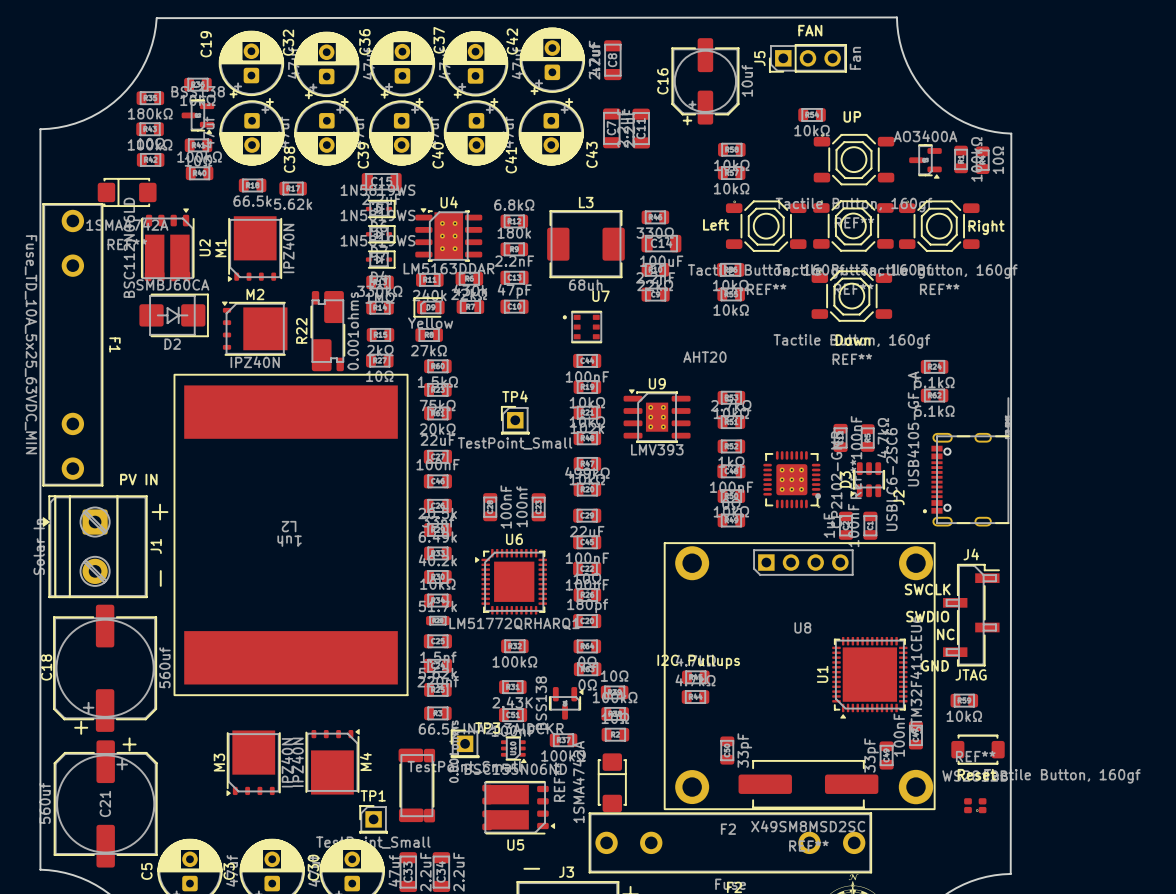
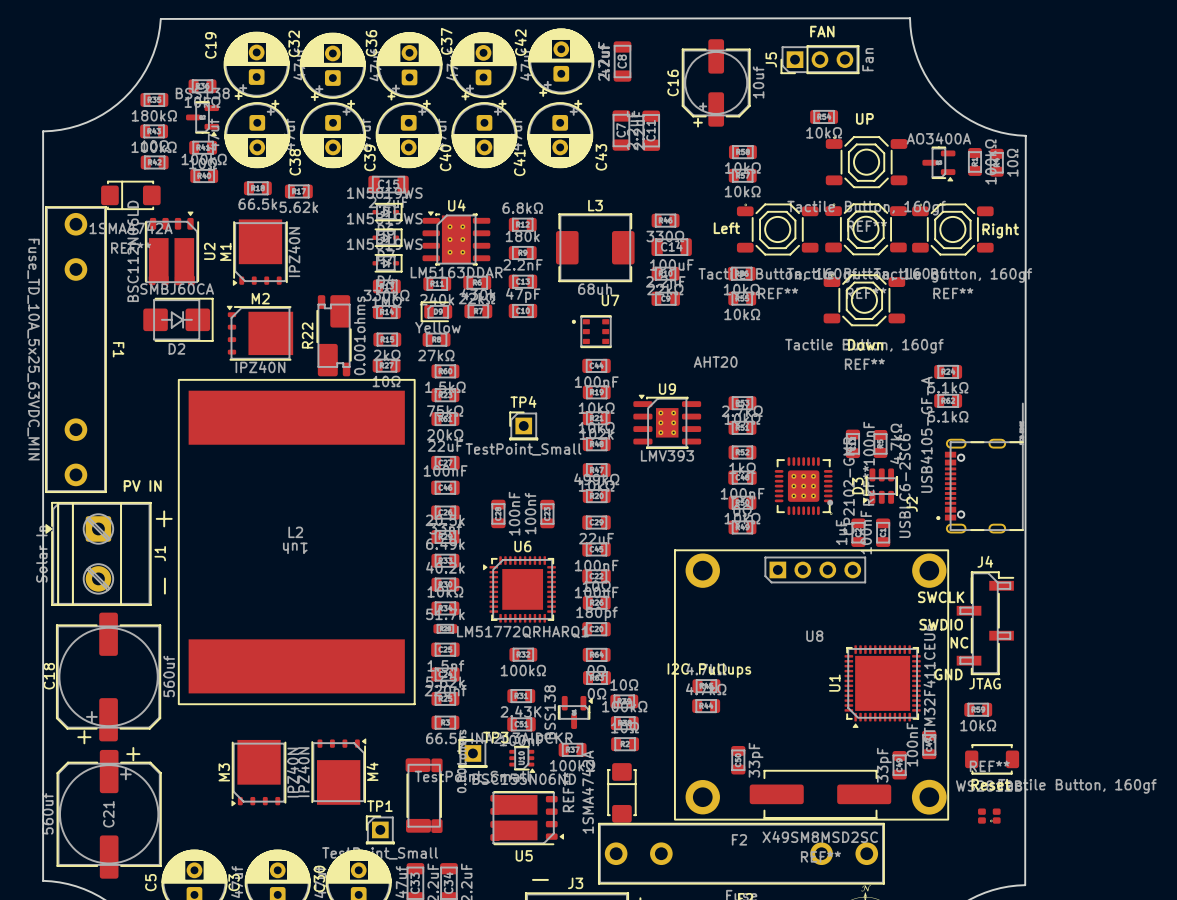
L2 name rotation: 0° (289, 526) -> 180° (295, 532)

